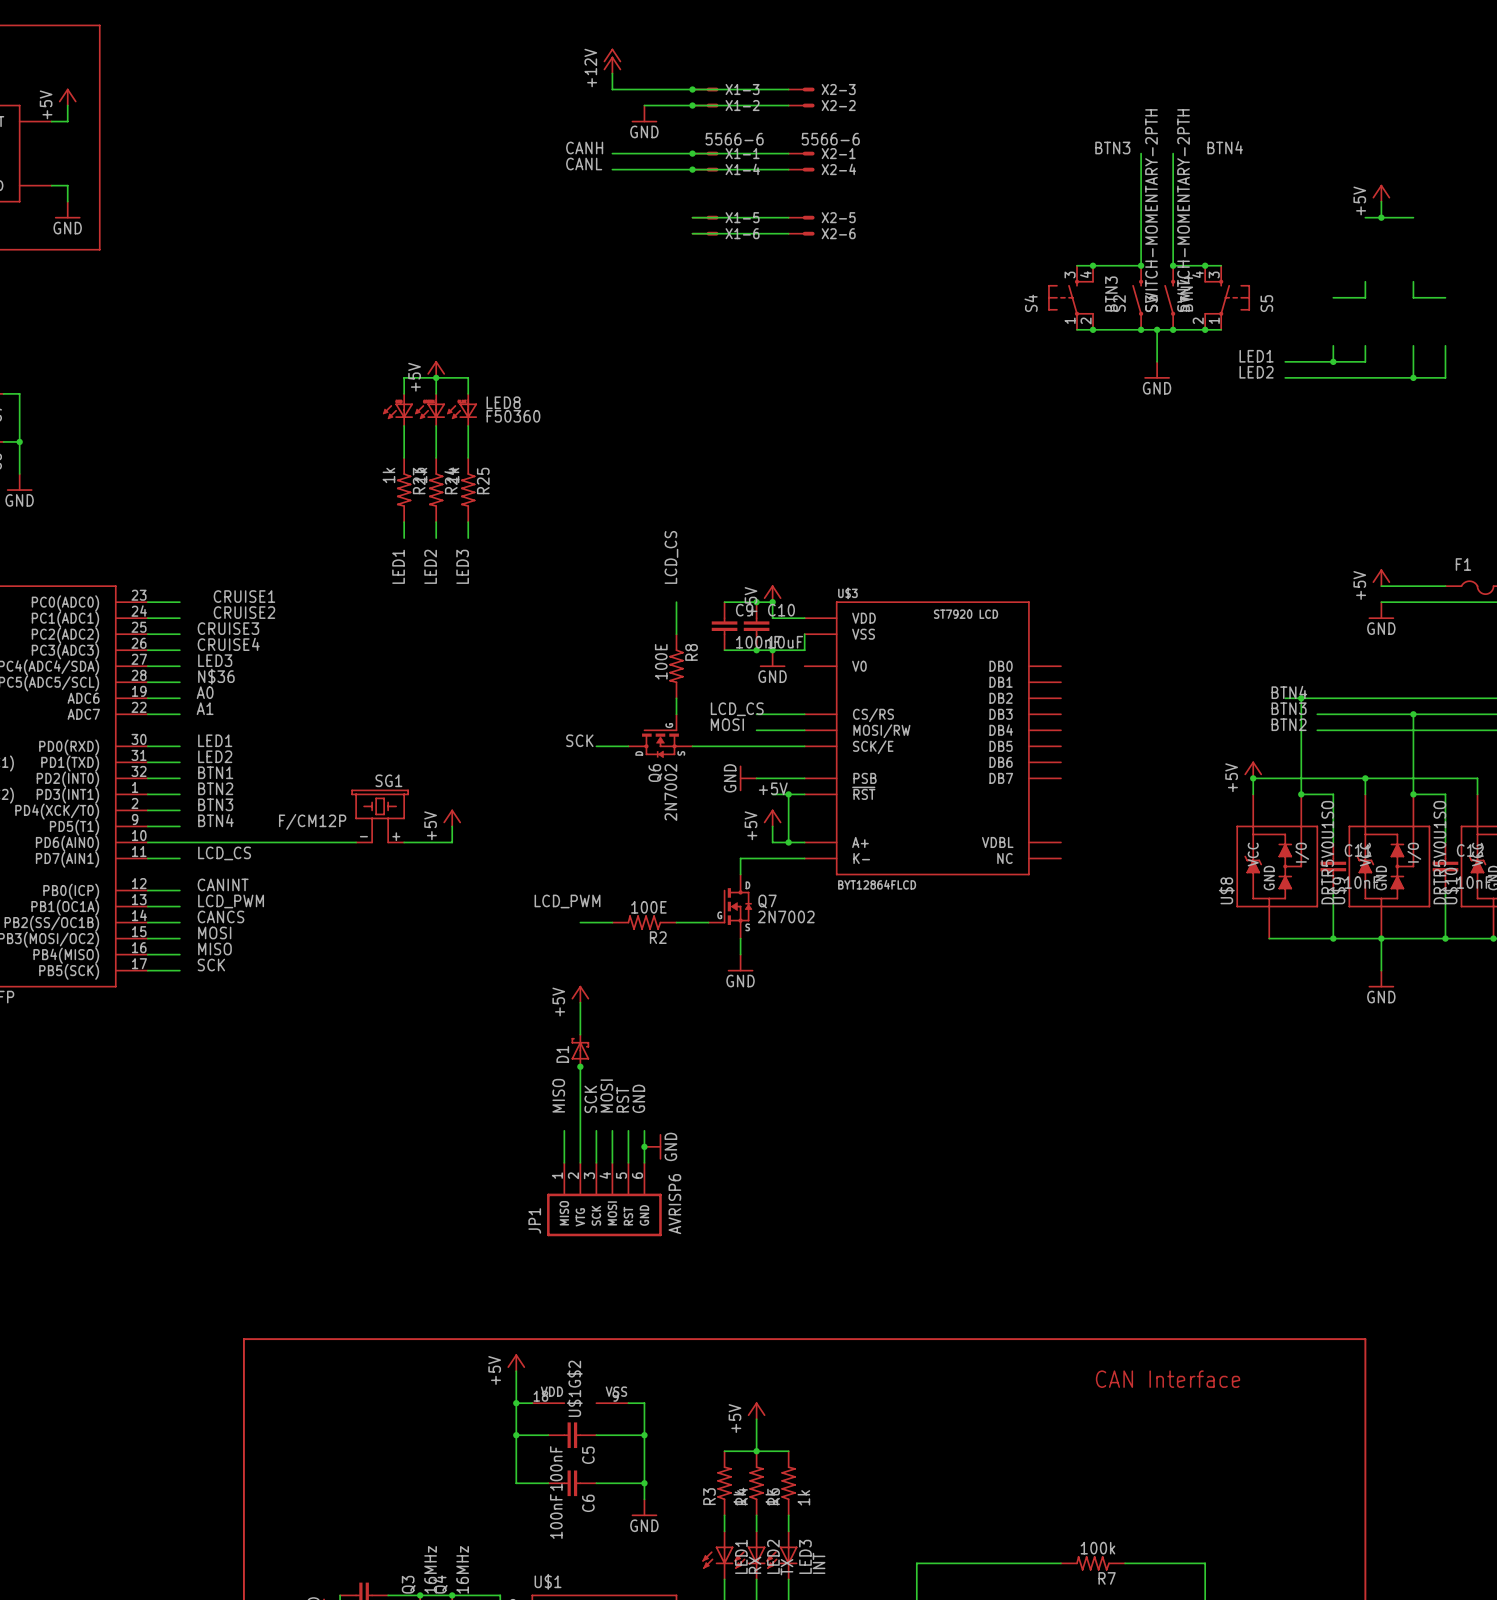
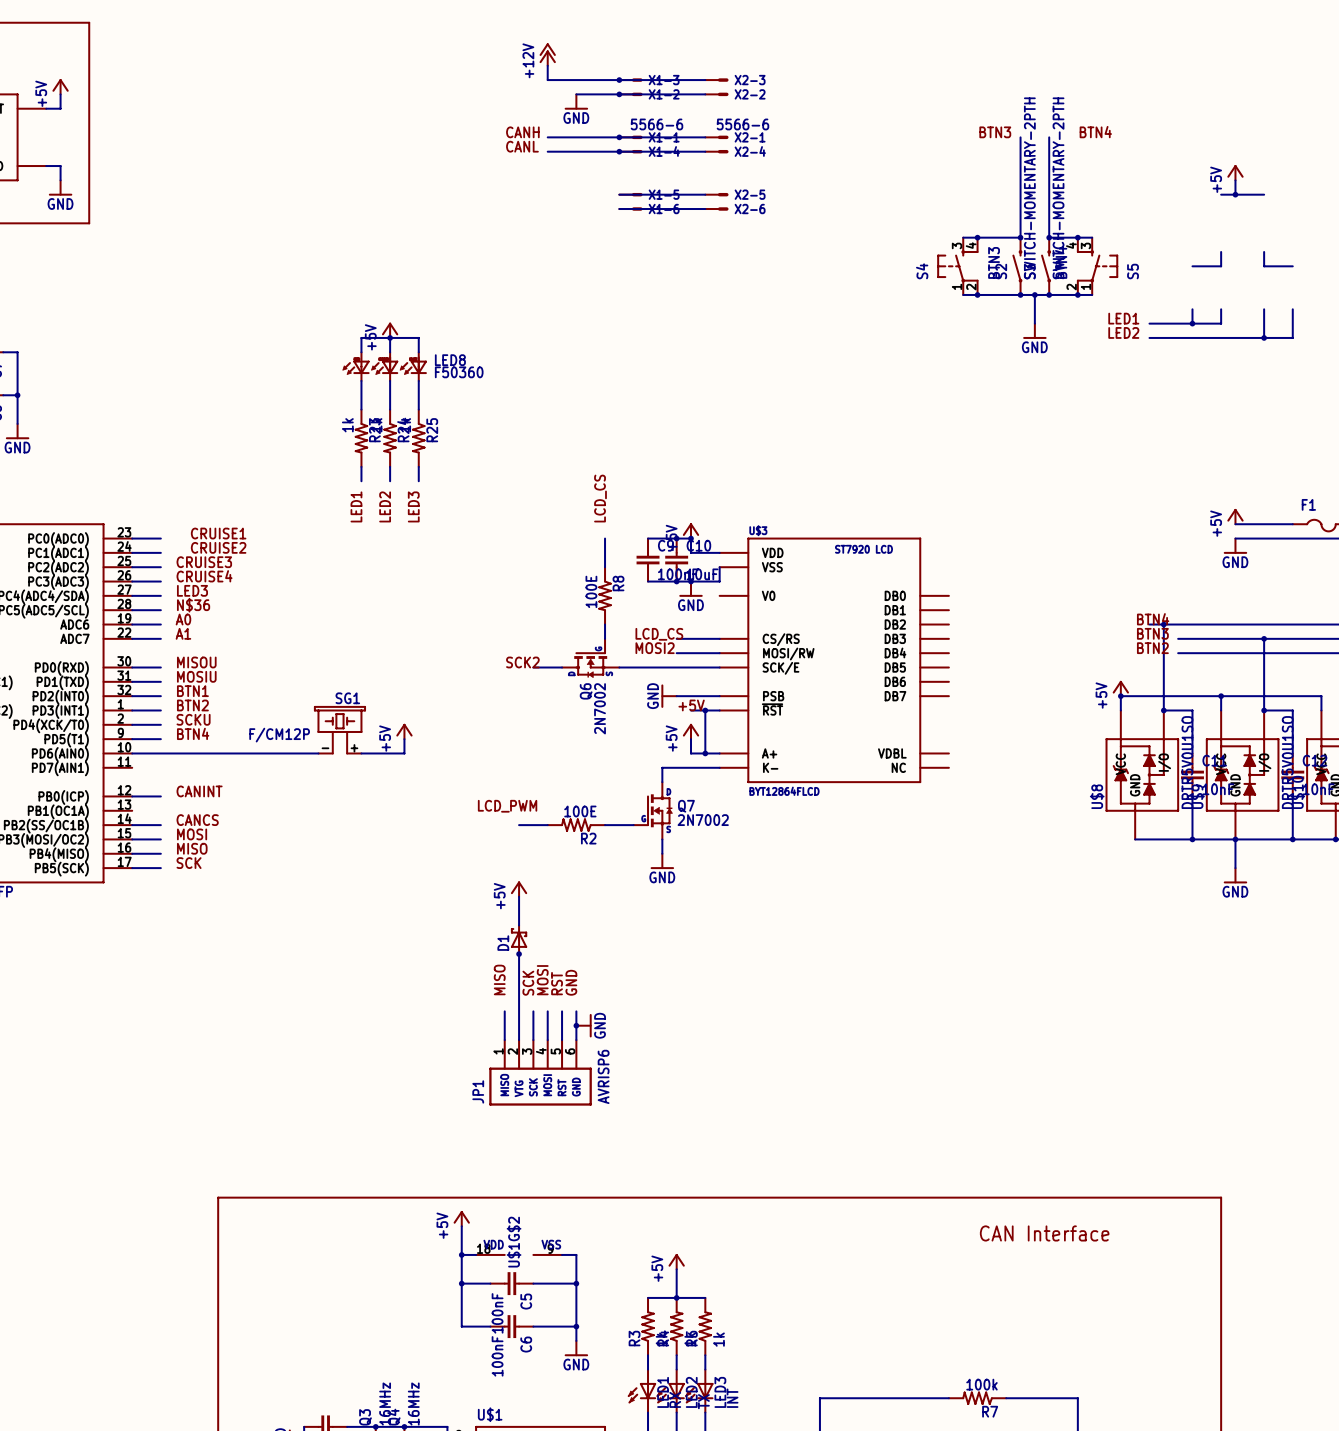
label: MOSI (727, 724) -> MOSI2 (655, 648)
label: LED1 (215, 740) -> MISOU (196, 662)
label: SCK (579, 740) -> SCK2 (522, 662)
label: LED2 (215, 756) -> MOSIU (196, 676)
label: BTN3 (215, 804) -> SCKU (193, 719)
label: LCD_CS (224, 853) -> none
wire: (147, 858) (179, 858) -> none
label: LCD_PWM (231, 901) -> none
wire: (147, 906) (179, 906) -> none

